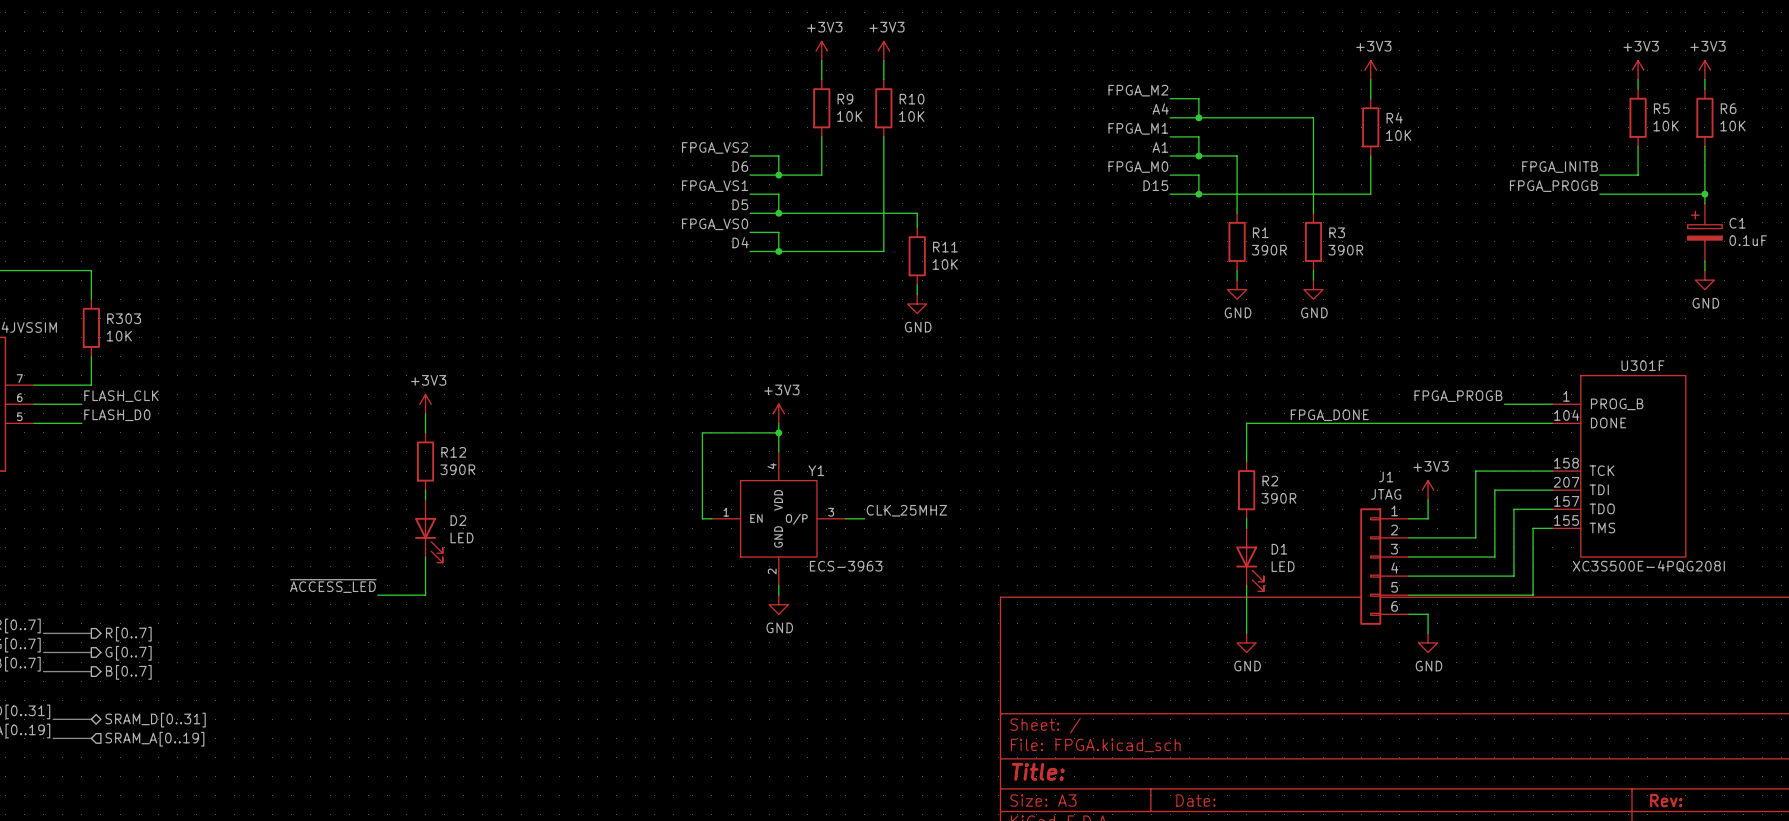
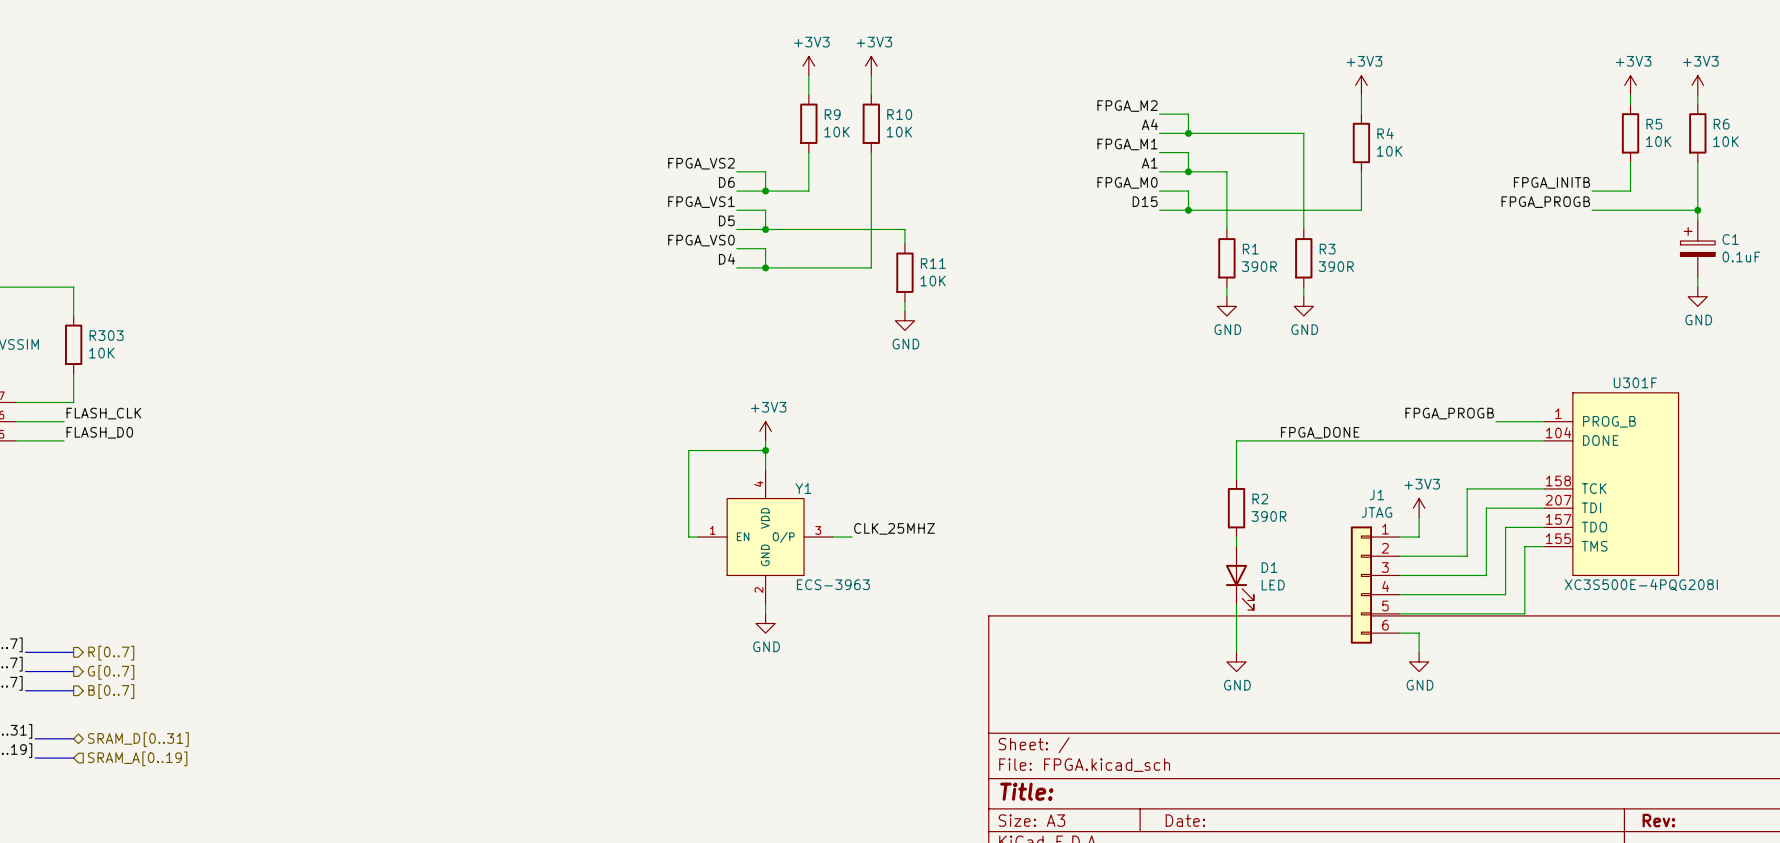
power symbol: +3V3 (425, 404) -> none
wire: (425, 413) (425, 432) -> none
R12: 390R (425, 461) -> none
wire: (425, 490) (425, 499) -> none
D2: LED (428, 531) -> none
wire: (425, 557) (425, 595) (377, 595) -> none
label: ~{ACCESS_LED} (333, 586) -> none

